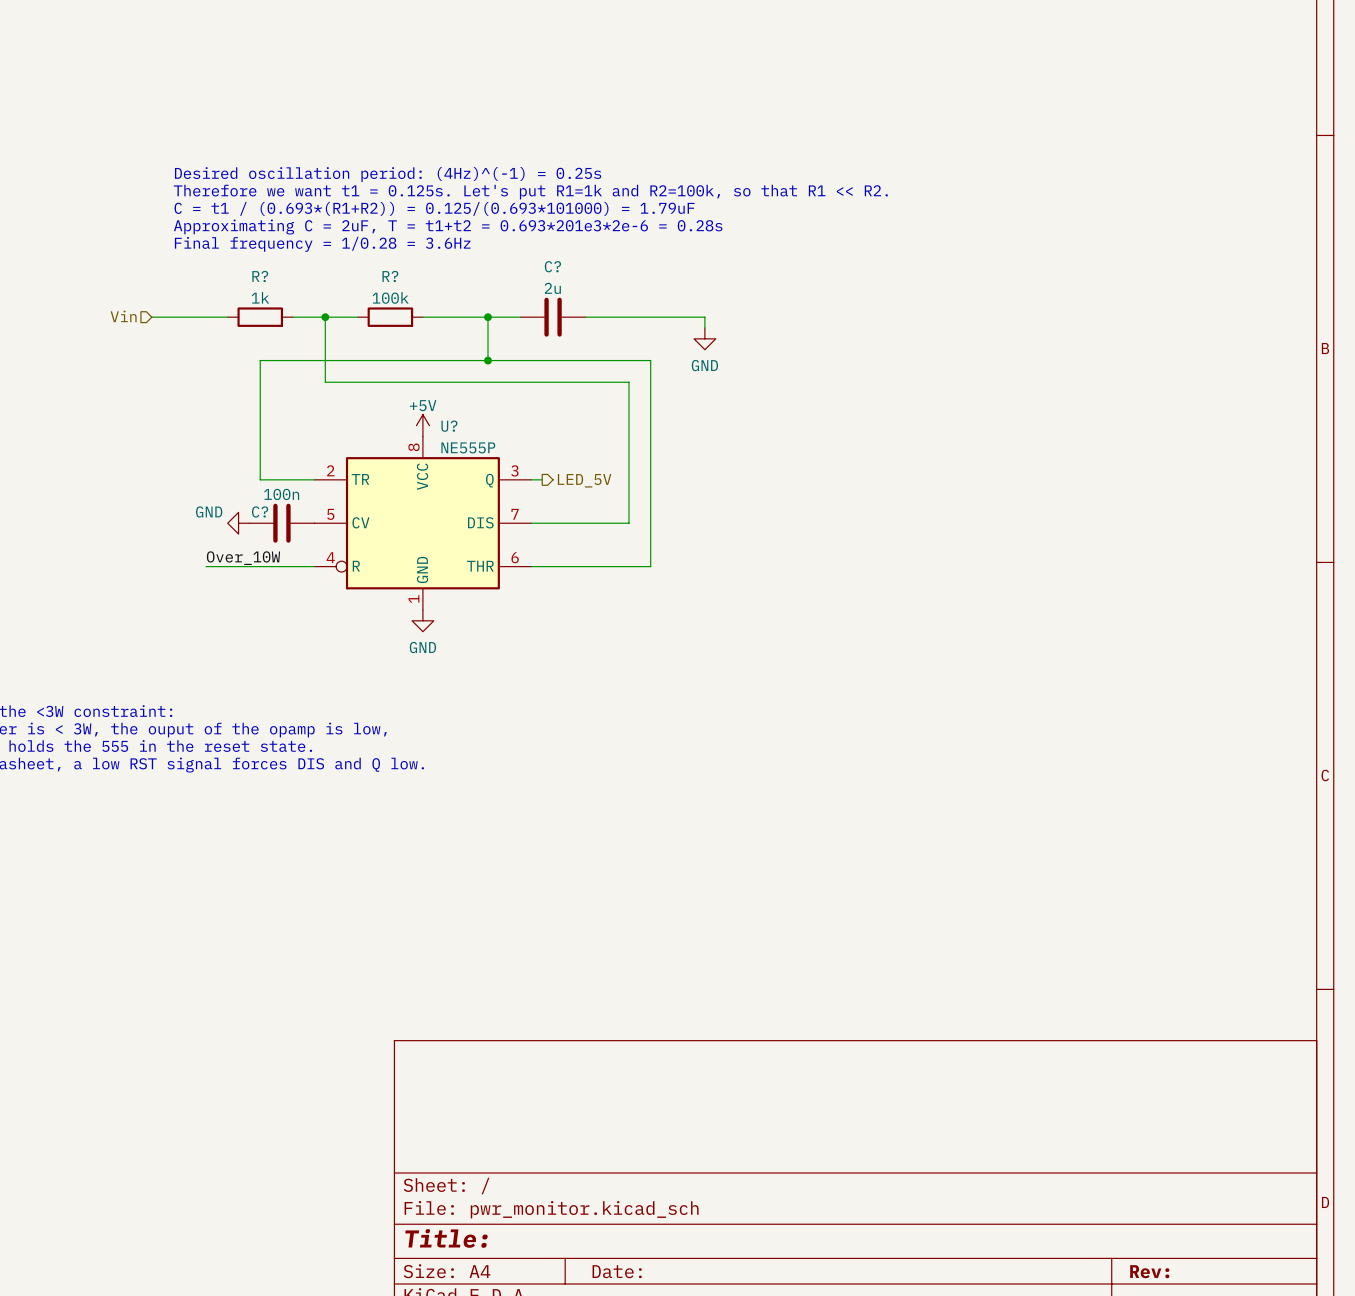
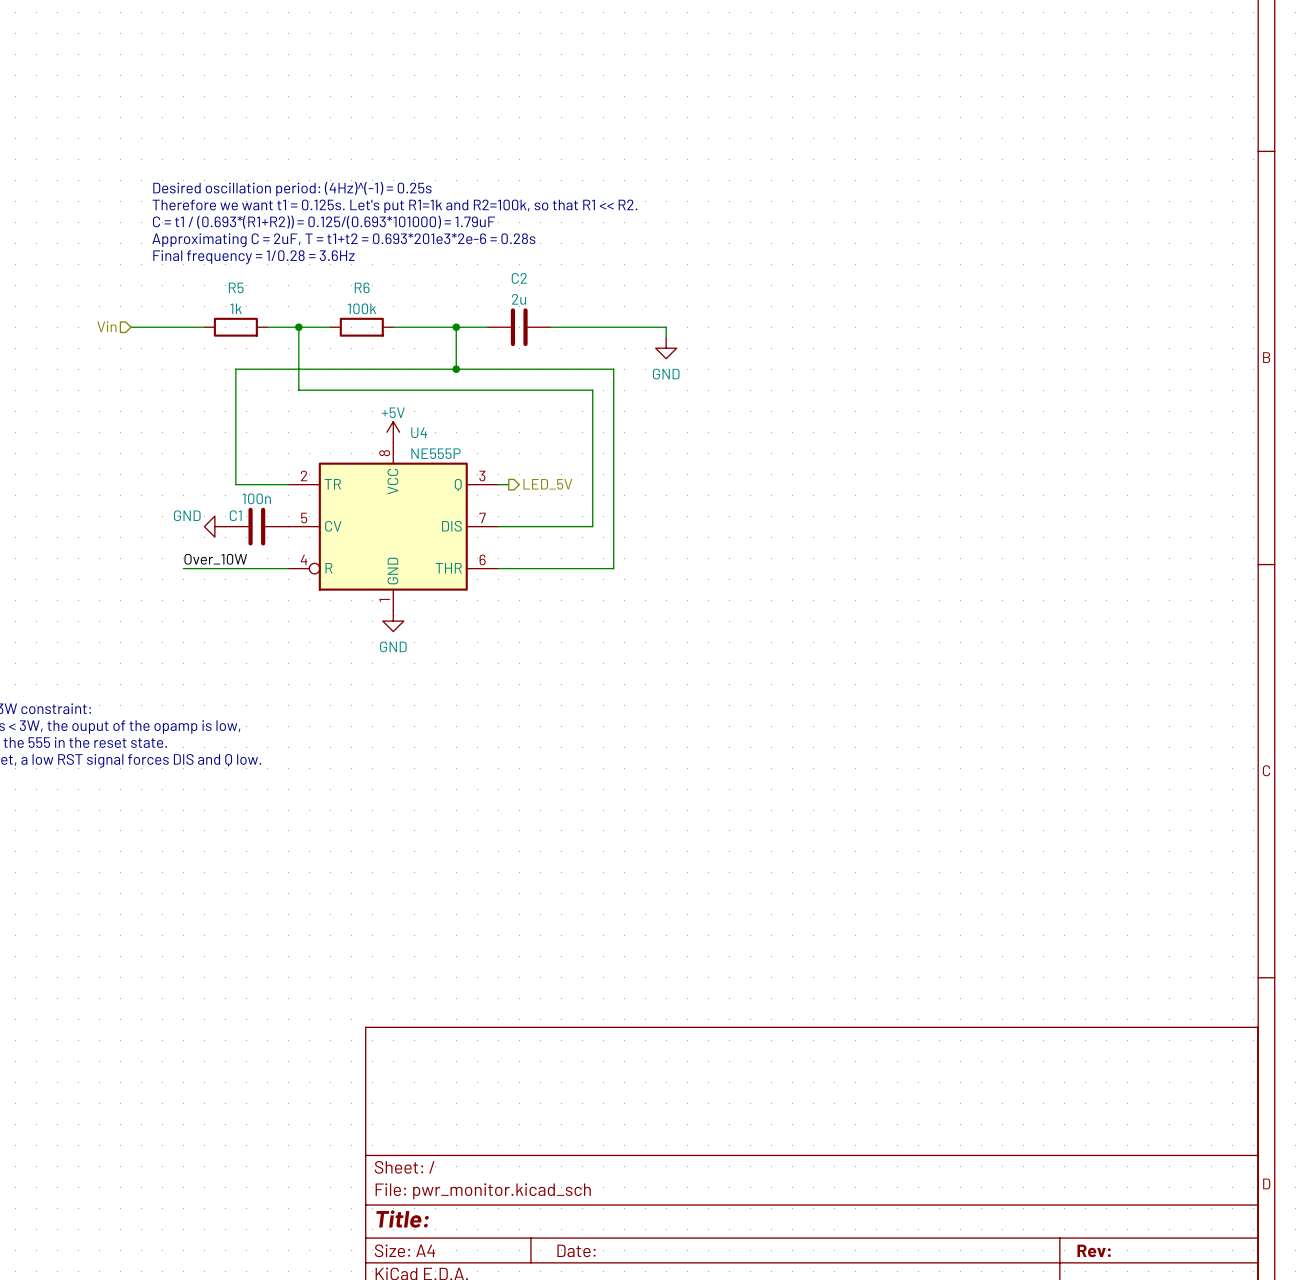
C? name: C? (552, 266) -> C2 (519, 278)
R? name: R? (260, 276) -> R5 (236, 287)
R? name: R? (390, 276) -> R6 (362, 287)
U? name: U? (449, 426) -> U4 (419, 432)
C? name: C? (260, 511) -> C1 (235, 515)

